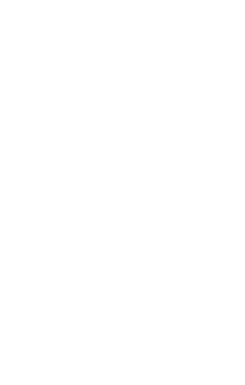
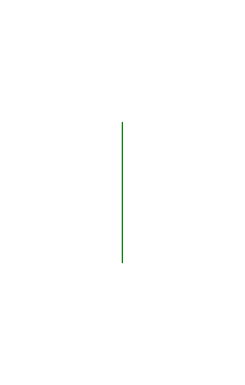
wire: none -> (122, 122) (122, 262)

